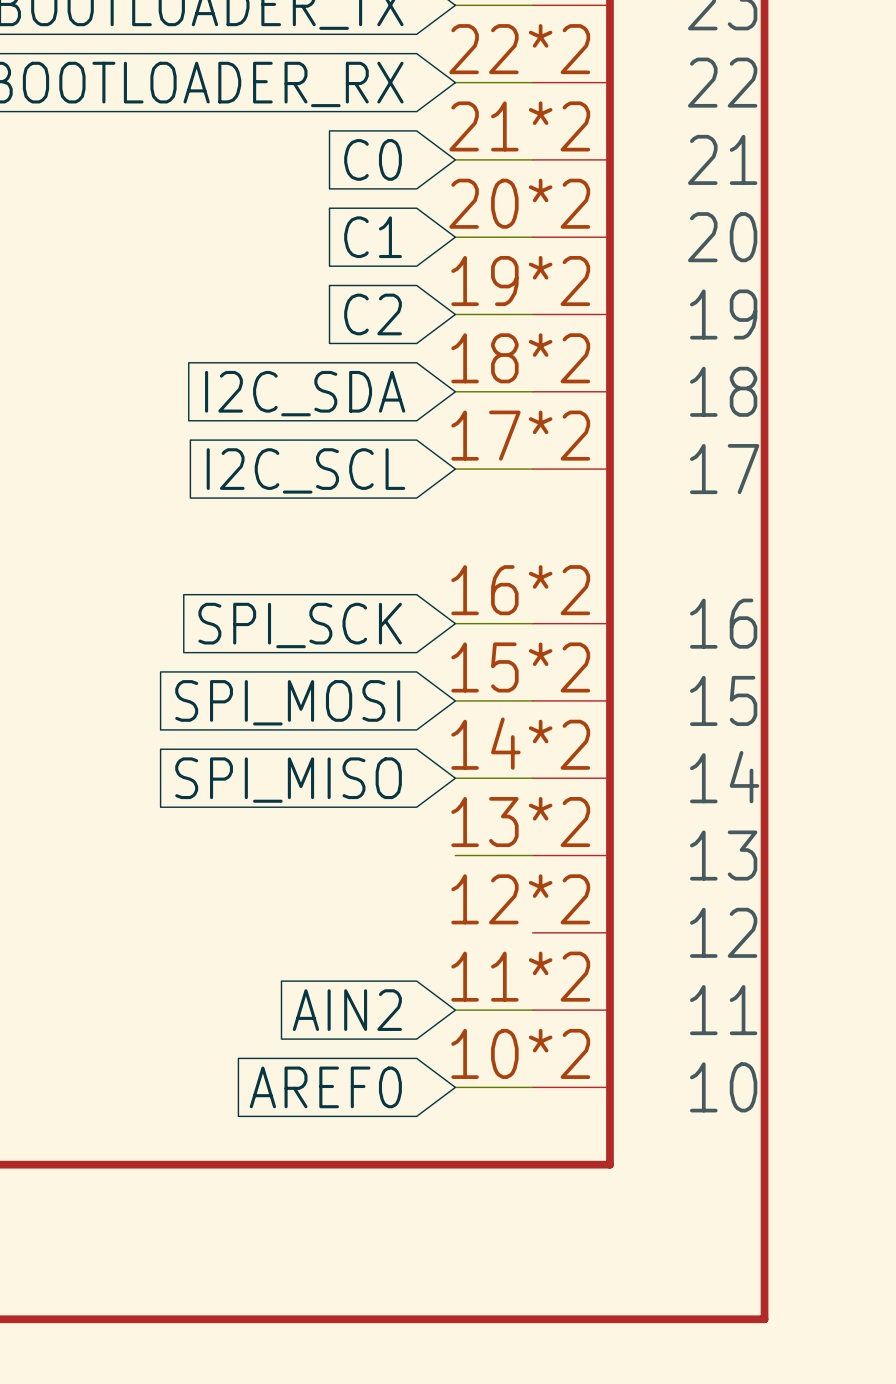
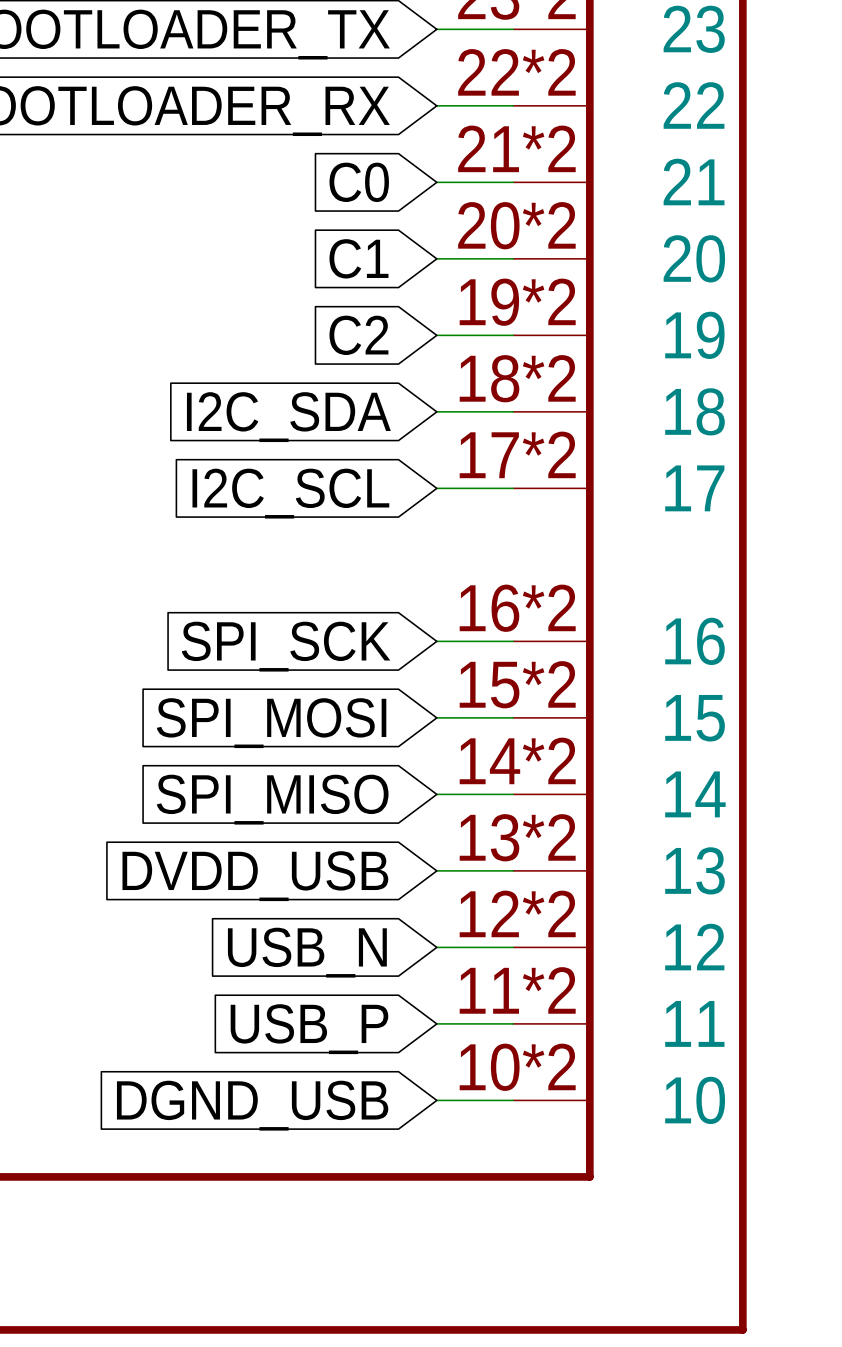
global label: none -> DVDD_USB (255, 876)
wire: none -> (436, 947) (513, 947)
global label: none -> USB_N (307, 952)
global label: AIN2 (347, 1010) -> USB_P (309, 1029)
global label: AREF0 (325, 1087) -> DGND_USB (252, 1105)

